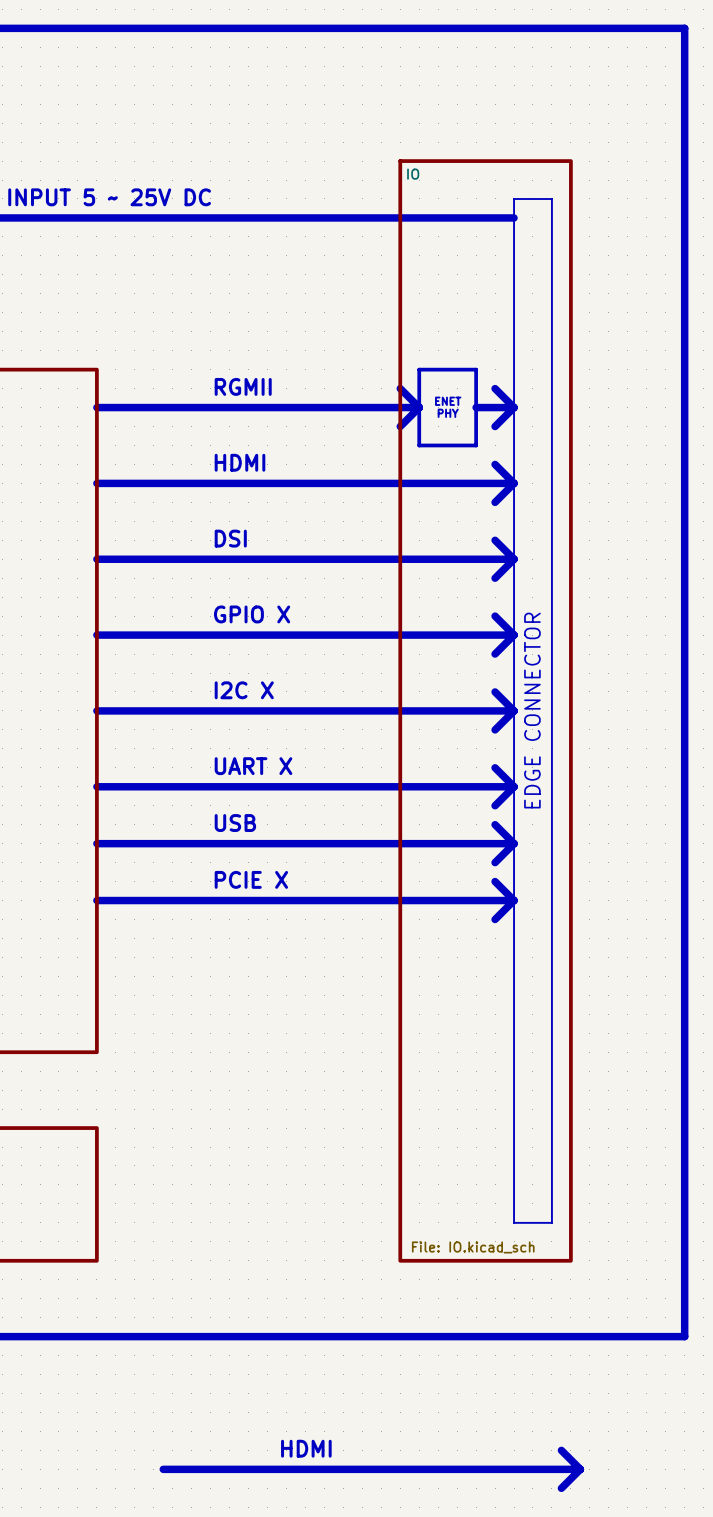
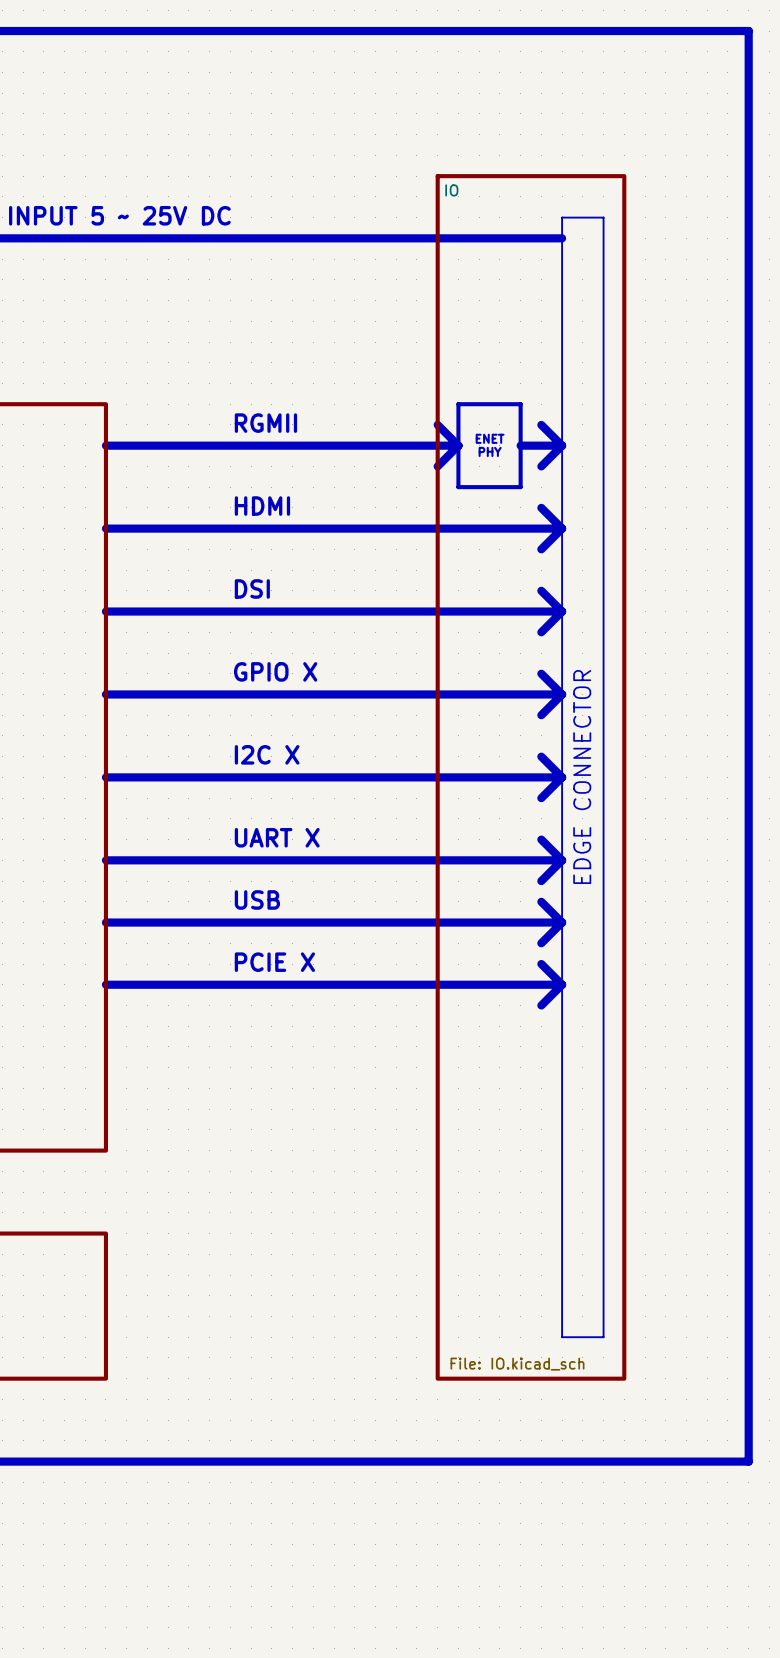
text: HDMI (306, 1448) -> none
line: (561, 1450) (580, 1469) -> none
line: (163, 1469) (580, 1469) -> none
line: (580, 1469) (561, 1488) -> none

